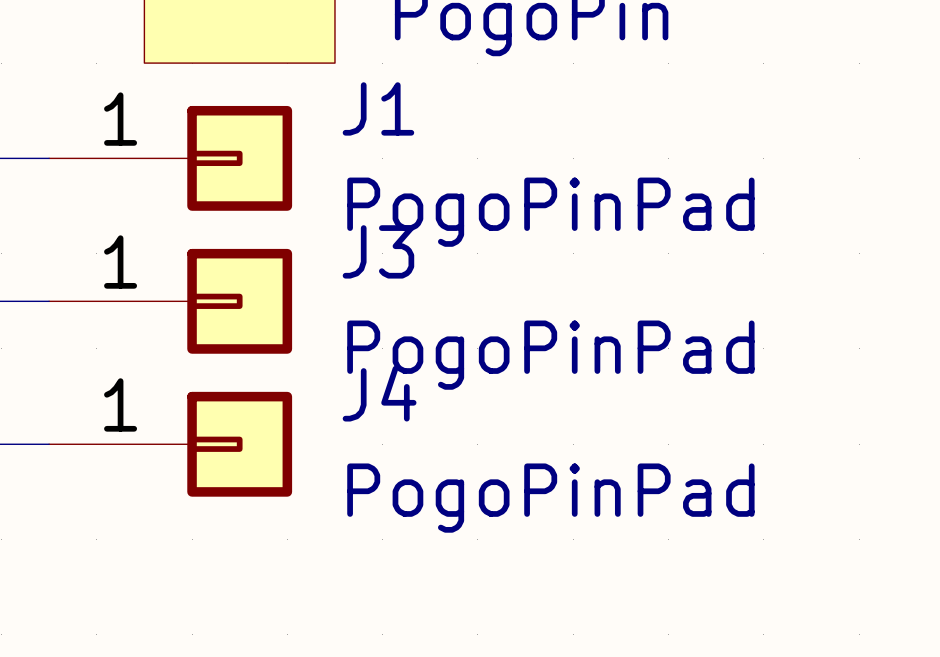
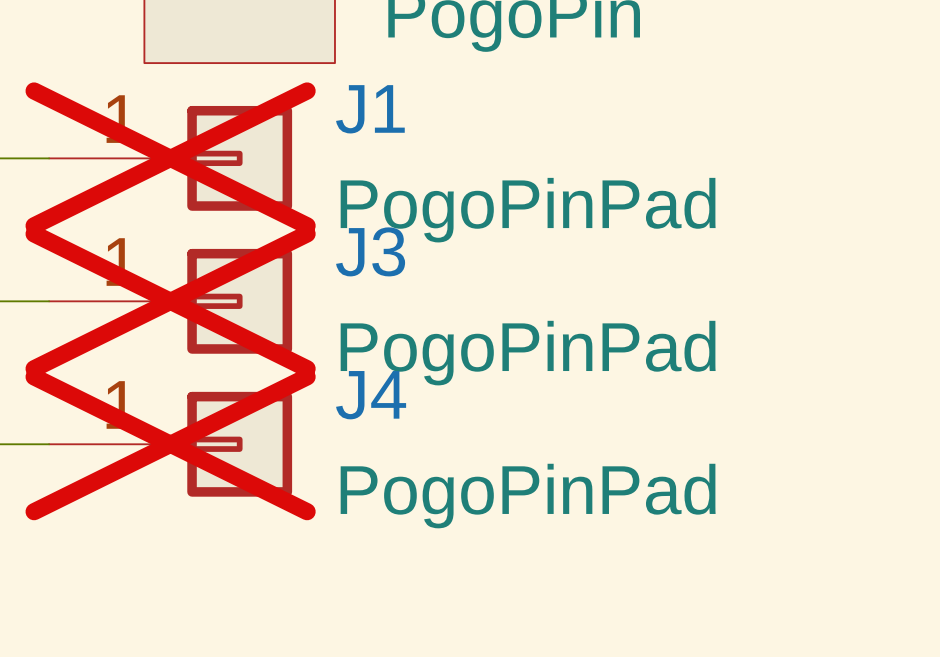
J1 do-not-place cross: none -> (170, 158)
J3 do-not-place cross: none -> (170, 301)
J4 do-not-place cross: none -> (170, 444)

